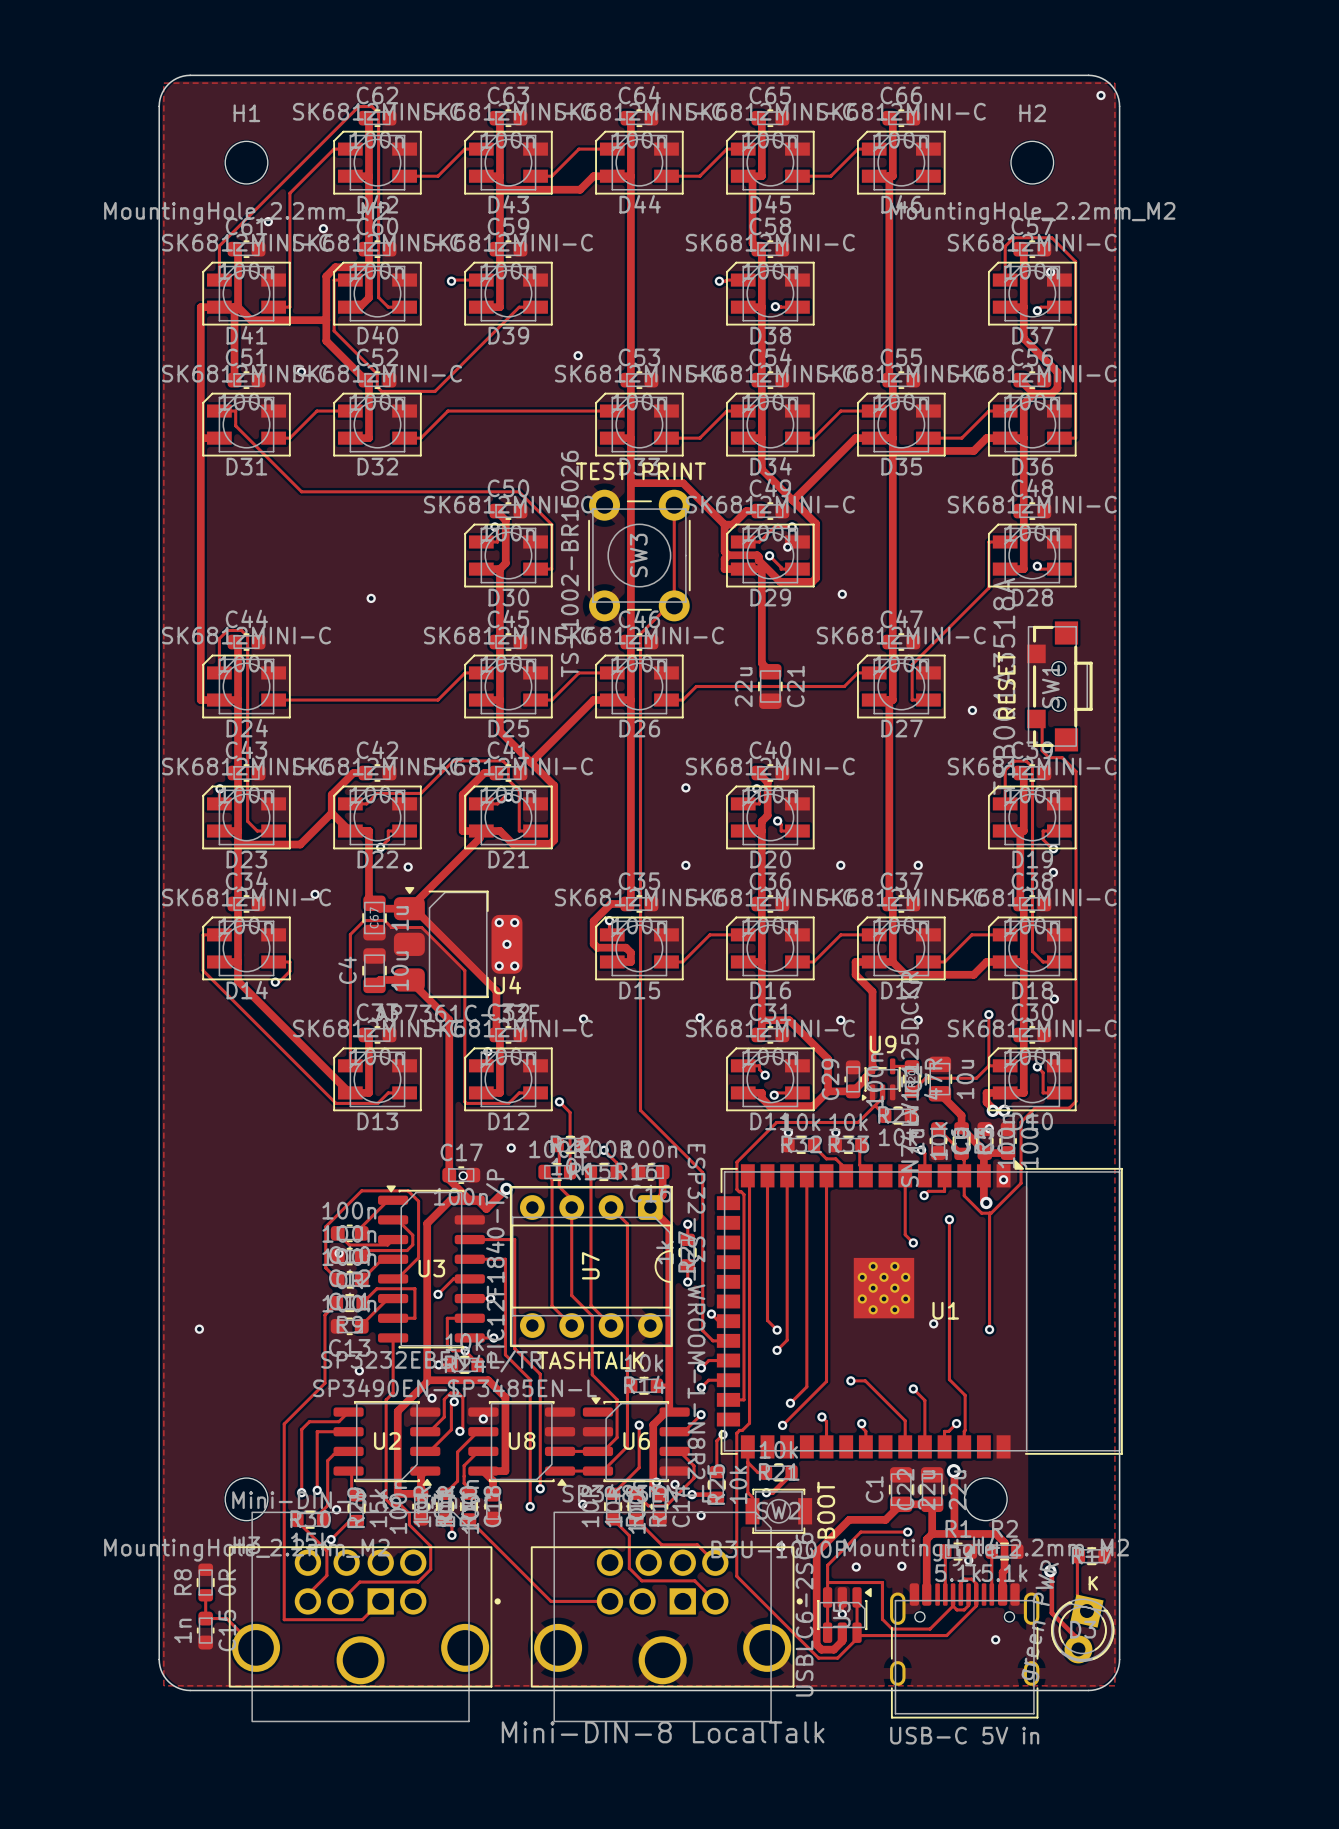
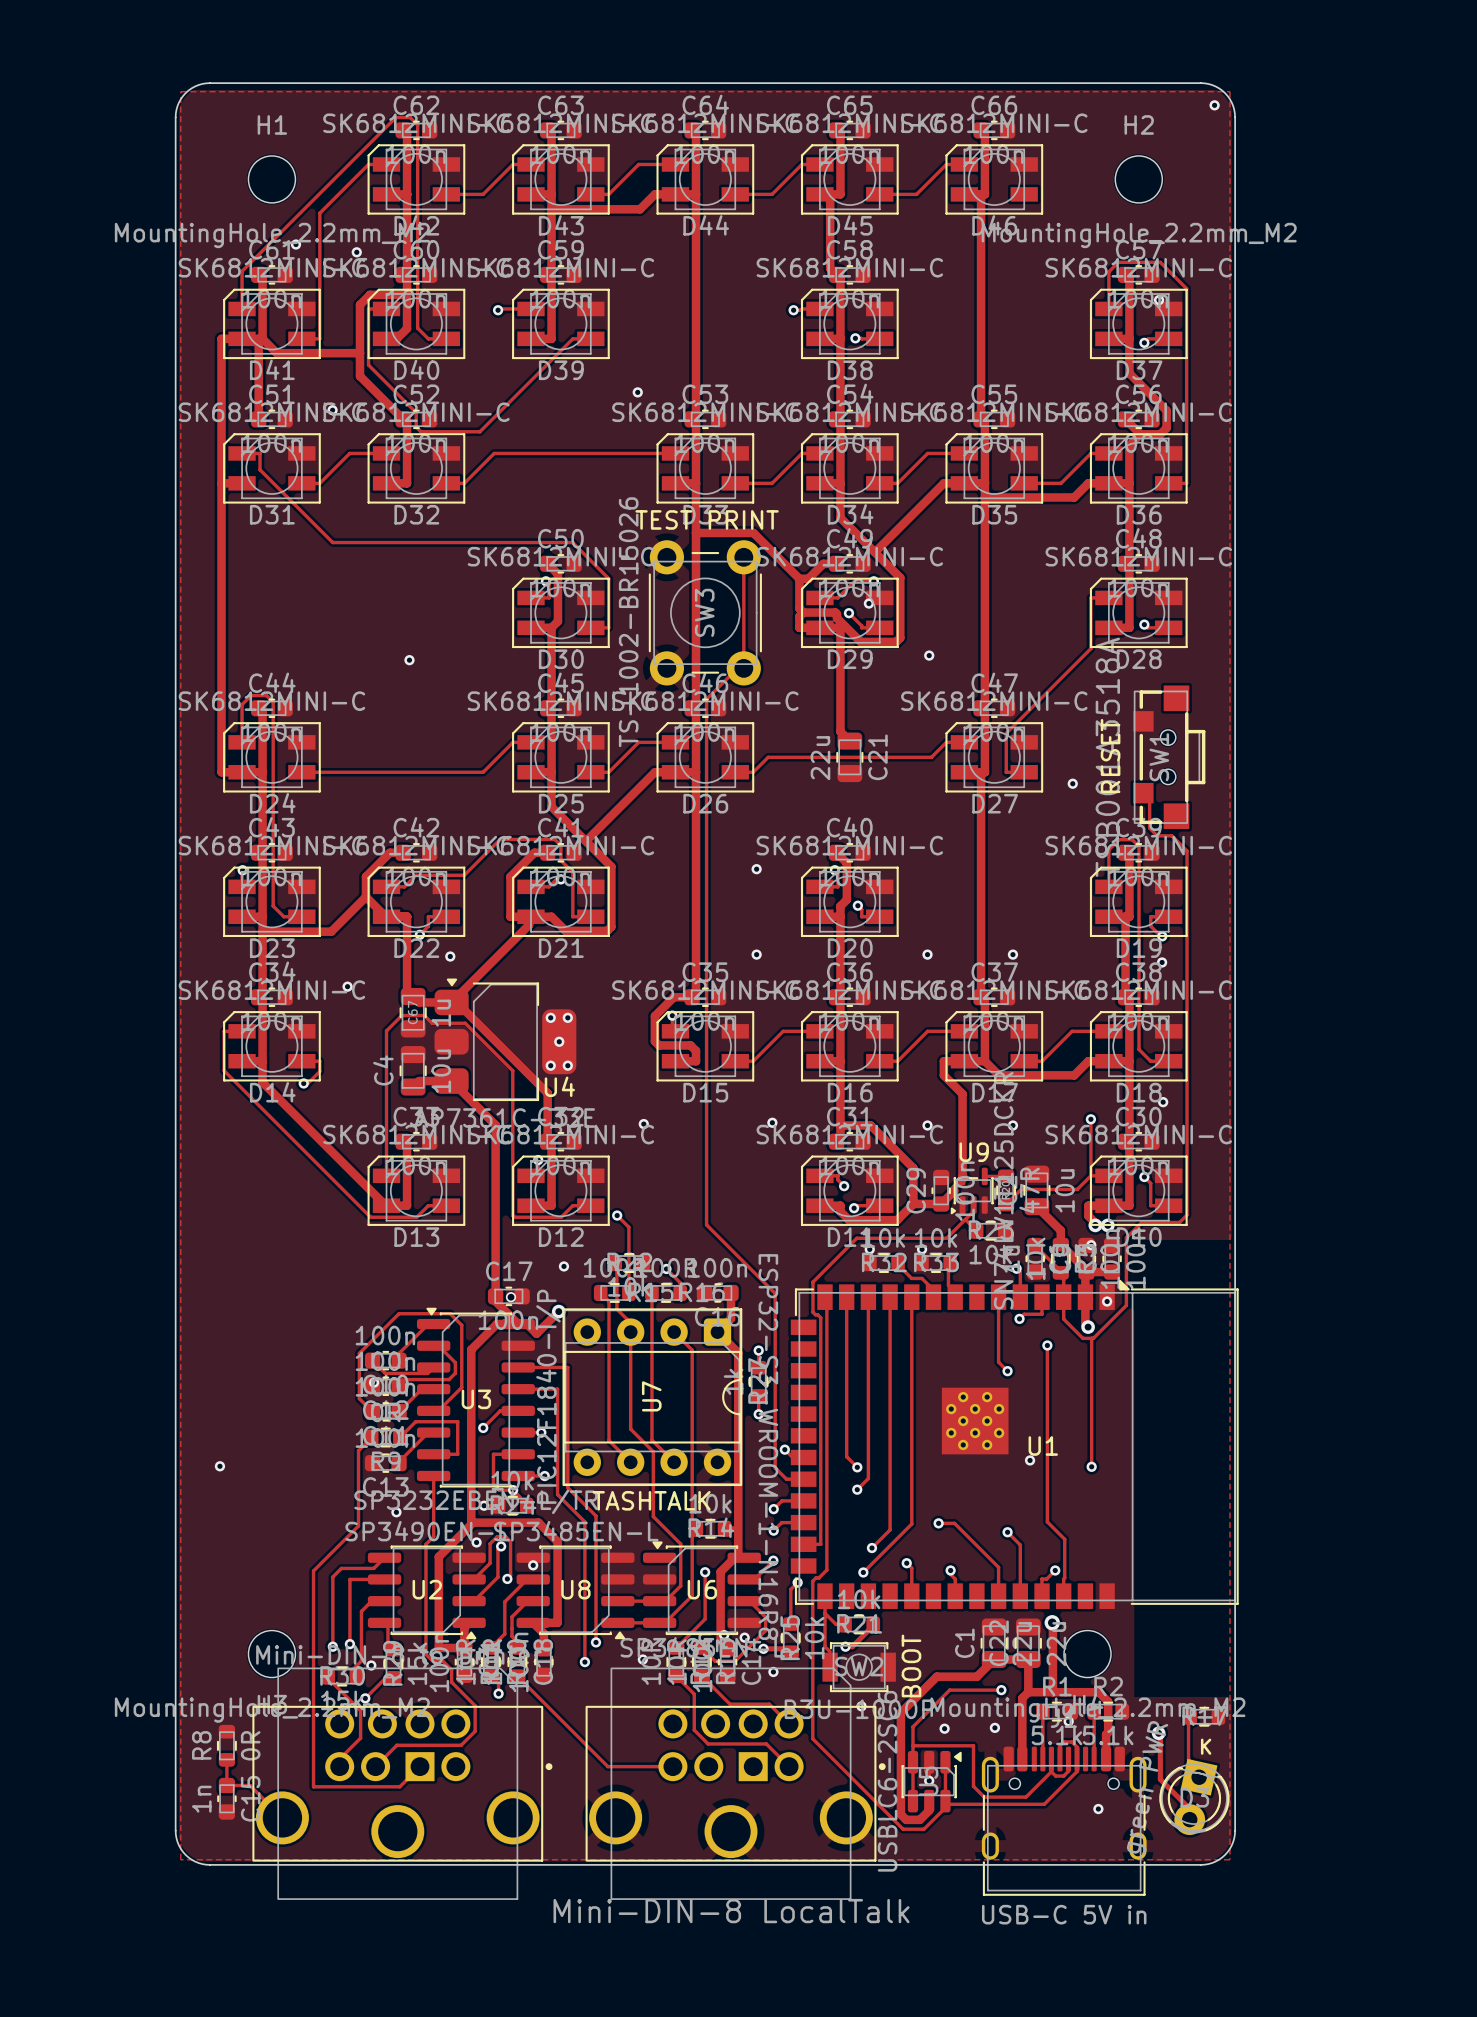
U1 value: ESP32-S3-WROOM-1-N8R2 (696, 1311) -> ESP32-S3-WROOM-1-N16R8 (768, 1447)

